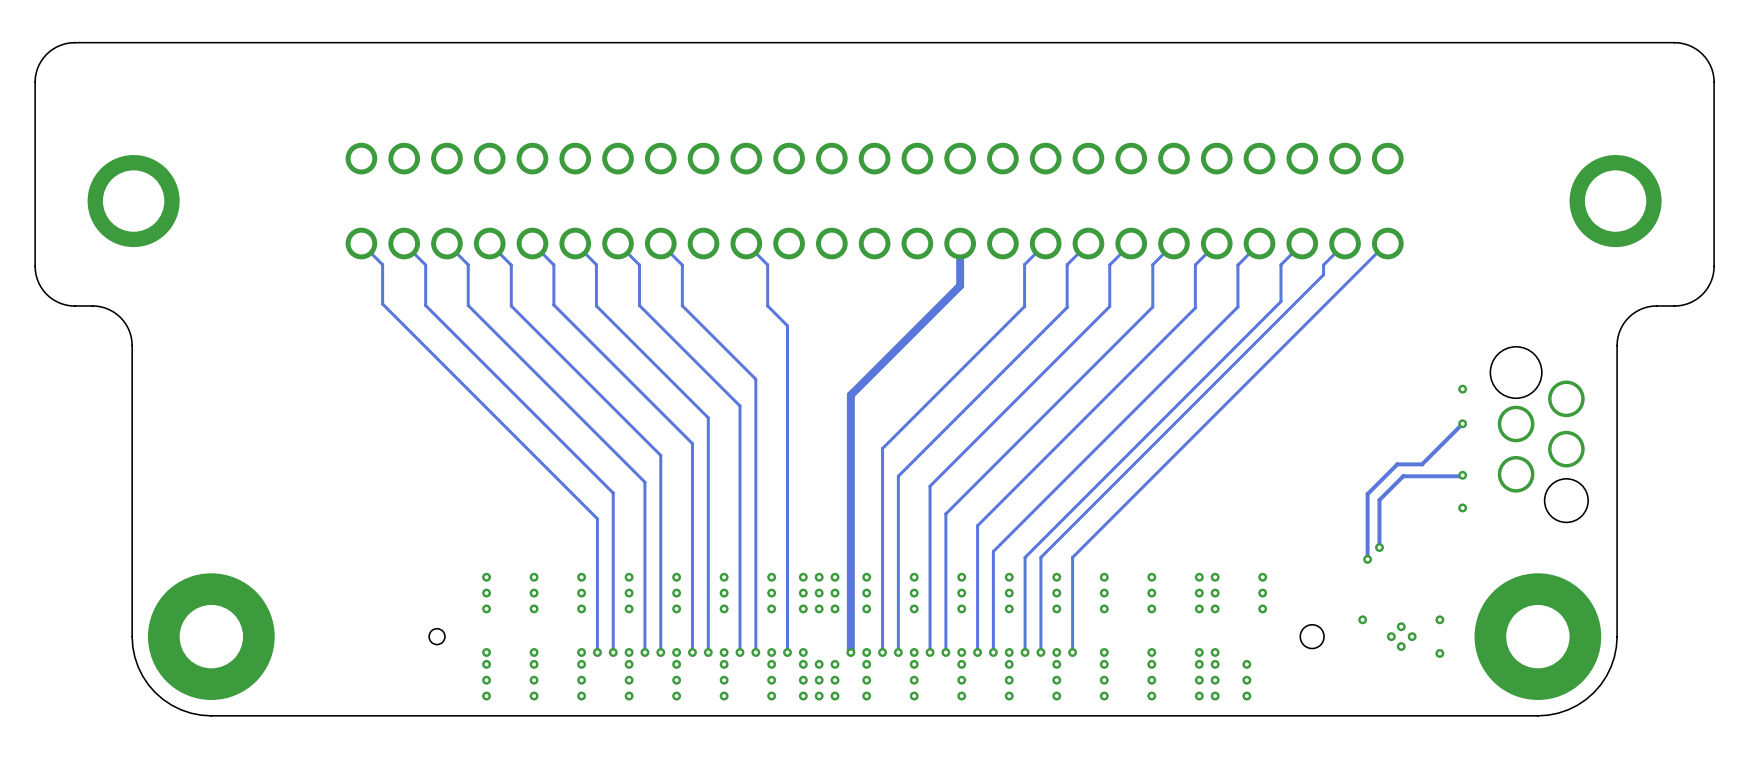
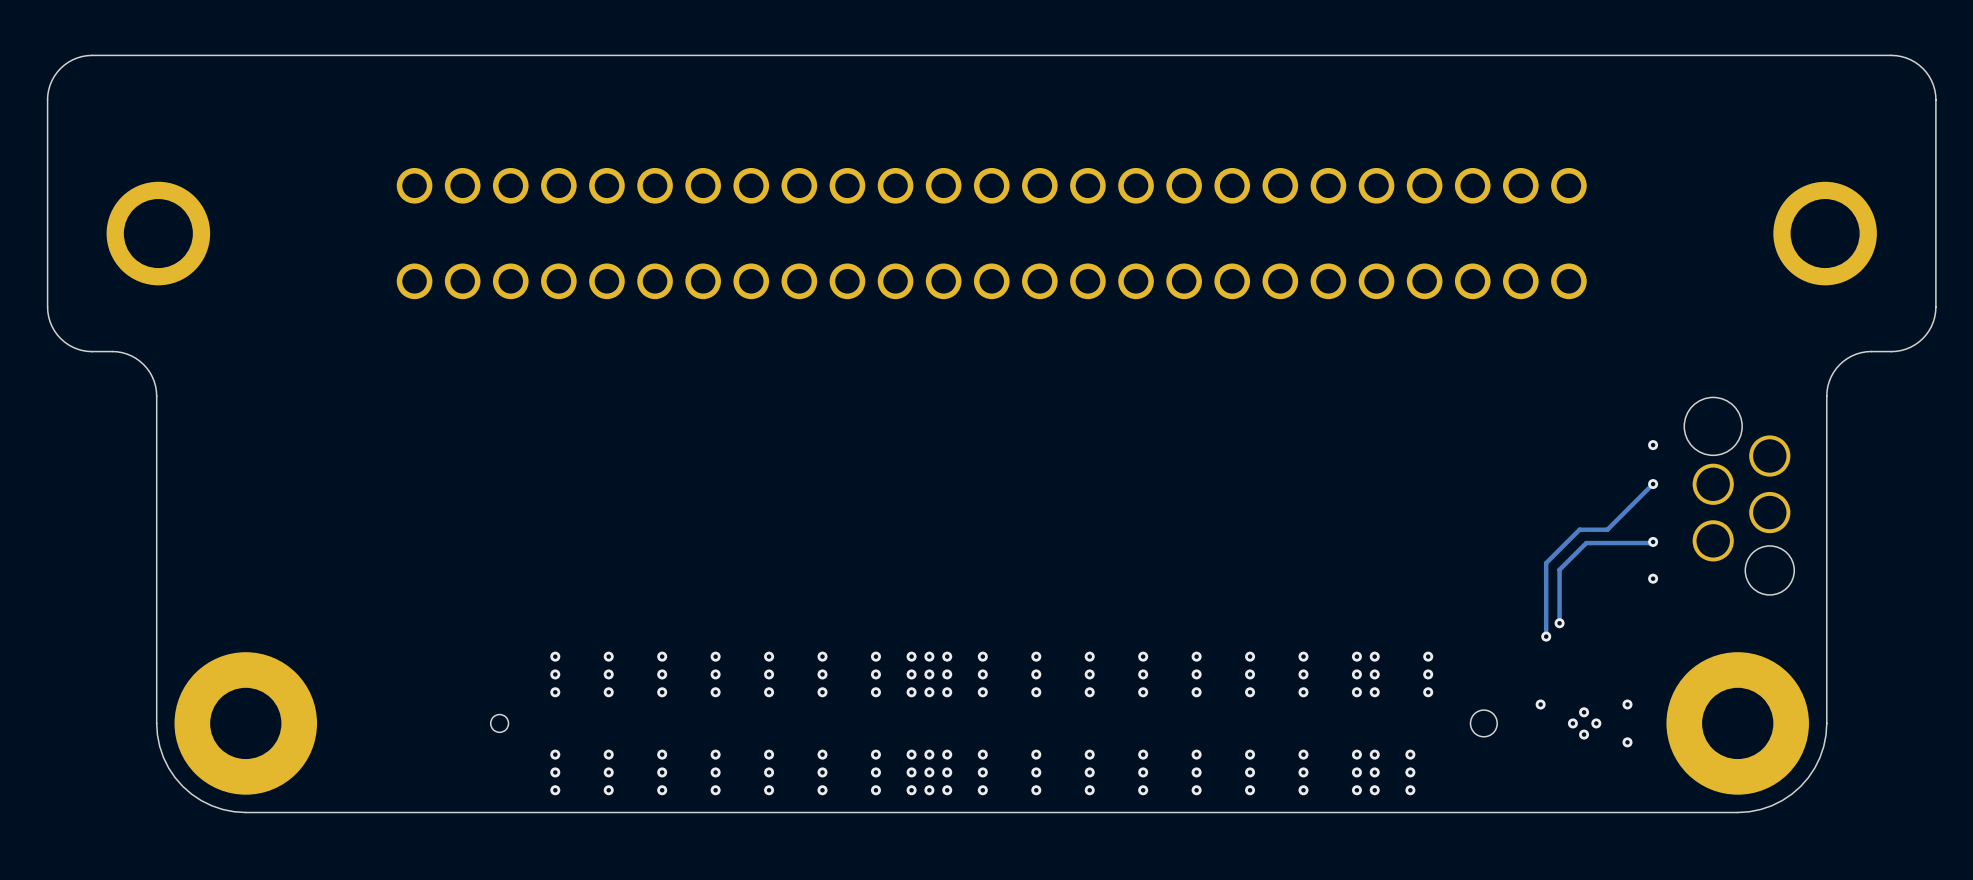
track: (361, 243) (382, 264) (382, 304) (597, 518) (597, 652) -> none
track: (404, 243) (425, 265) (425, 305) (613, 493) (613, 652) -> none
track: (446, 243) (468, 264) (468, 305) (644, 482) (644, 652) -> none
track: (489, 243) (511, 265) (511, 306) (660, 455) (660, 652) -> none
track: (532, 243) (553, 264) (553, 305) (692, 443) (692, 652) -> none
track: (575, 243) (596, 264) (596, 306) (708, 417) (708, 652) -> none
track: (618, 243) (639, 265) (639, 305) (739, 405) (739, 652) -> none
track: (660, 243) (682, 265) (682, 305) (755, 379) (755, 652) -> none
track: (746, 243) (767, 264) (767, 306) (787, 325) (787, 652) -> none
track: (960, 243) (960, 285) (850, 395) (850, 652) -> none
track: (1045, 243) (1024, 264) (1024, 306) (882, 448) (882, 652) -> none
track: (1088, 243) (1067, 264) (1067, 307) (898, 476) (898, 652) -> none
track: (1131, 243) (1109, 265) (1109, 306) (930, 486) (930, 652) -> none
track: (1173, 243) (1152, 264) (1152, 306) (945, 513) (945, 652) -> none
track: (1216, 243) (1195, 264) (1195, 307) (977, 525) (977, 652) -> none
track: (1259, 243) (1237, 265) (1237, 306) (993, 551) (993, 652) -> none
track: (1302, 243) (1280, 264) (1280, 301) (1025, 557) (1025, 652) -> none
track: (1345, 243) (1323, 265) (1323, 274) (1040, 557) (1040, 652) -> none
track: (1387, 243) (1072, 557) (1072, 652) -> none
via: (486, 652) -> none
via: (534, 652) -> none
via: (581, 652) -> none
via: (597, 652) -> none
via: (613, 652) -> none
via: (629, 652) -> none
via: (644, 652) -> none
via: (660, 652) -> none
via: (676, 652) -> none
via: (692, 652) -> none
via: (708, 652) -> none
via: (724, 652) -> none
via: (739, 652) -> none
via: (755, 652) -> none
via: (771, 652) -> none
via: (787, 652) -> none
via: (803, 652) -> none
via: (850, 652) -> none
via: (866, 652) -> none
via: (882, 652) -> none
via: (898, 652) -> none
via: (914, 652) -> none
via: (930, 652) -> none
via: (945, 652) -> none
via: (961, 652) -> none
via: (977, 652) -> none
via: (993, 652) -> none
via: (1009, 652) -> none
via: (1025, 652) -> none
via: (1040, 652) -> none
via: (1056, 652) -> none
via: (1072, 652) -> none
via: (1104, 652) -> none
via: (1151, 652) -> none
via: (1199, 652) -> none
via: (1215, 652) -> none

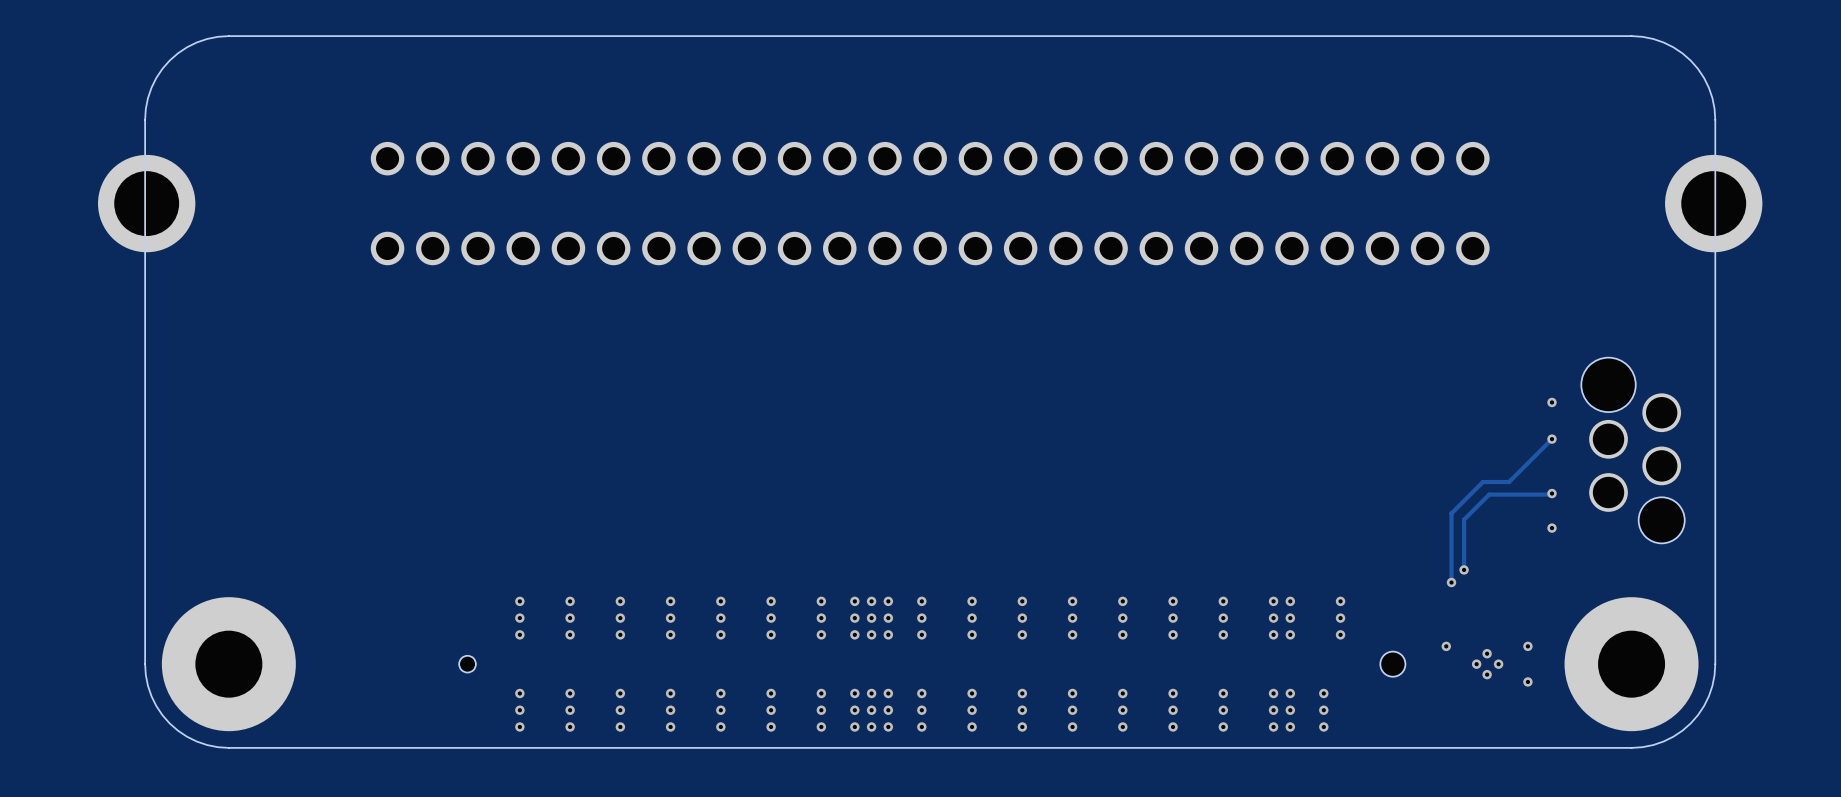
board edge: (245, 55) (82, 56) (68, 62) (60, 68) (51, 80) (48, 90) (47, 307) (50, 321) (57, 334) (72, 347) (87, 351) (122, 352) (135, 358) (149, 372) (155, 386) (156, 396) -> (228, 36) (196, 42) (177, 53) (162, 68) (147, 98) (145, 119) (145, 356)
board edge: (1737, 55) (1901, 56) (1910, 59) (1922, 68) (1929, 76) (1934, 90) (1935, 307) (1933, 321) (1922, 338) (1910, 347) (1896, 351) (1861, 352) (1847, 358) (1833, 372) (1829, 381) (1826, 396) -> (1631, 36) (1653, 38) (1682, 53) (1704, 77) (1712, 98) (1715, 119) (1715, 356)

